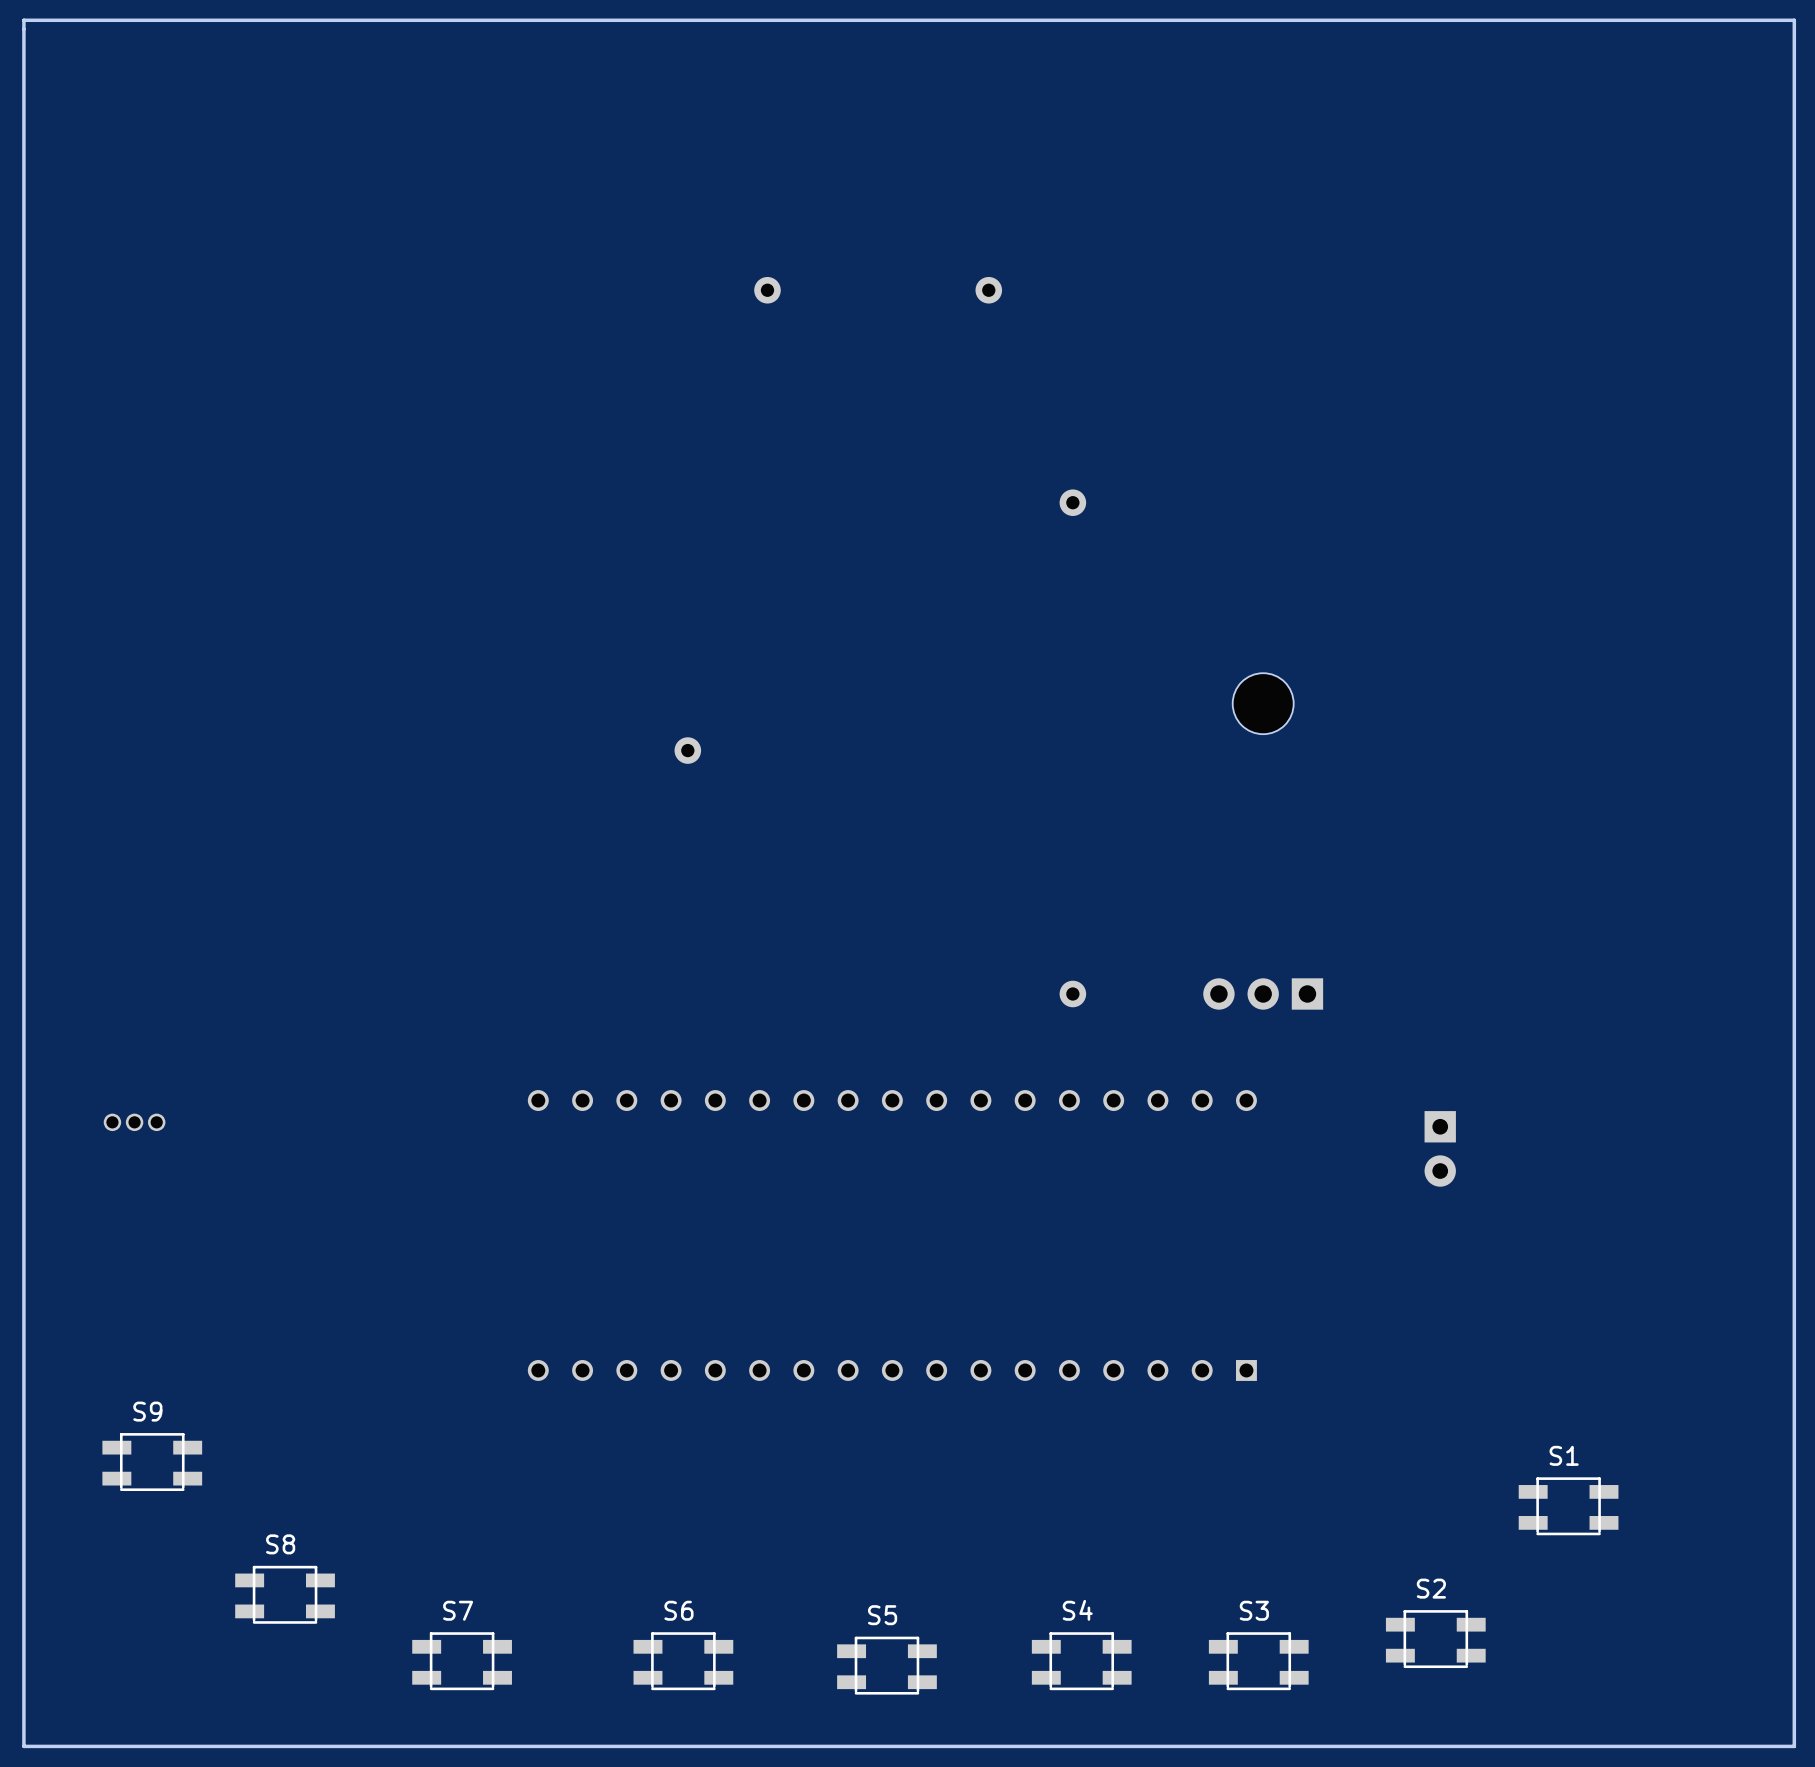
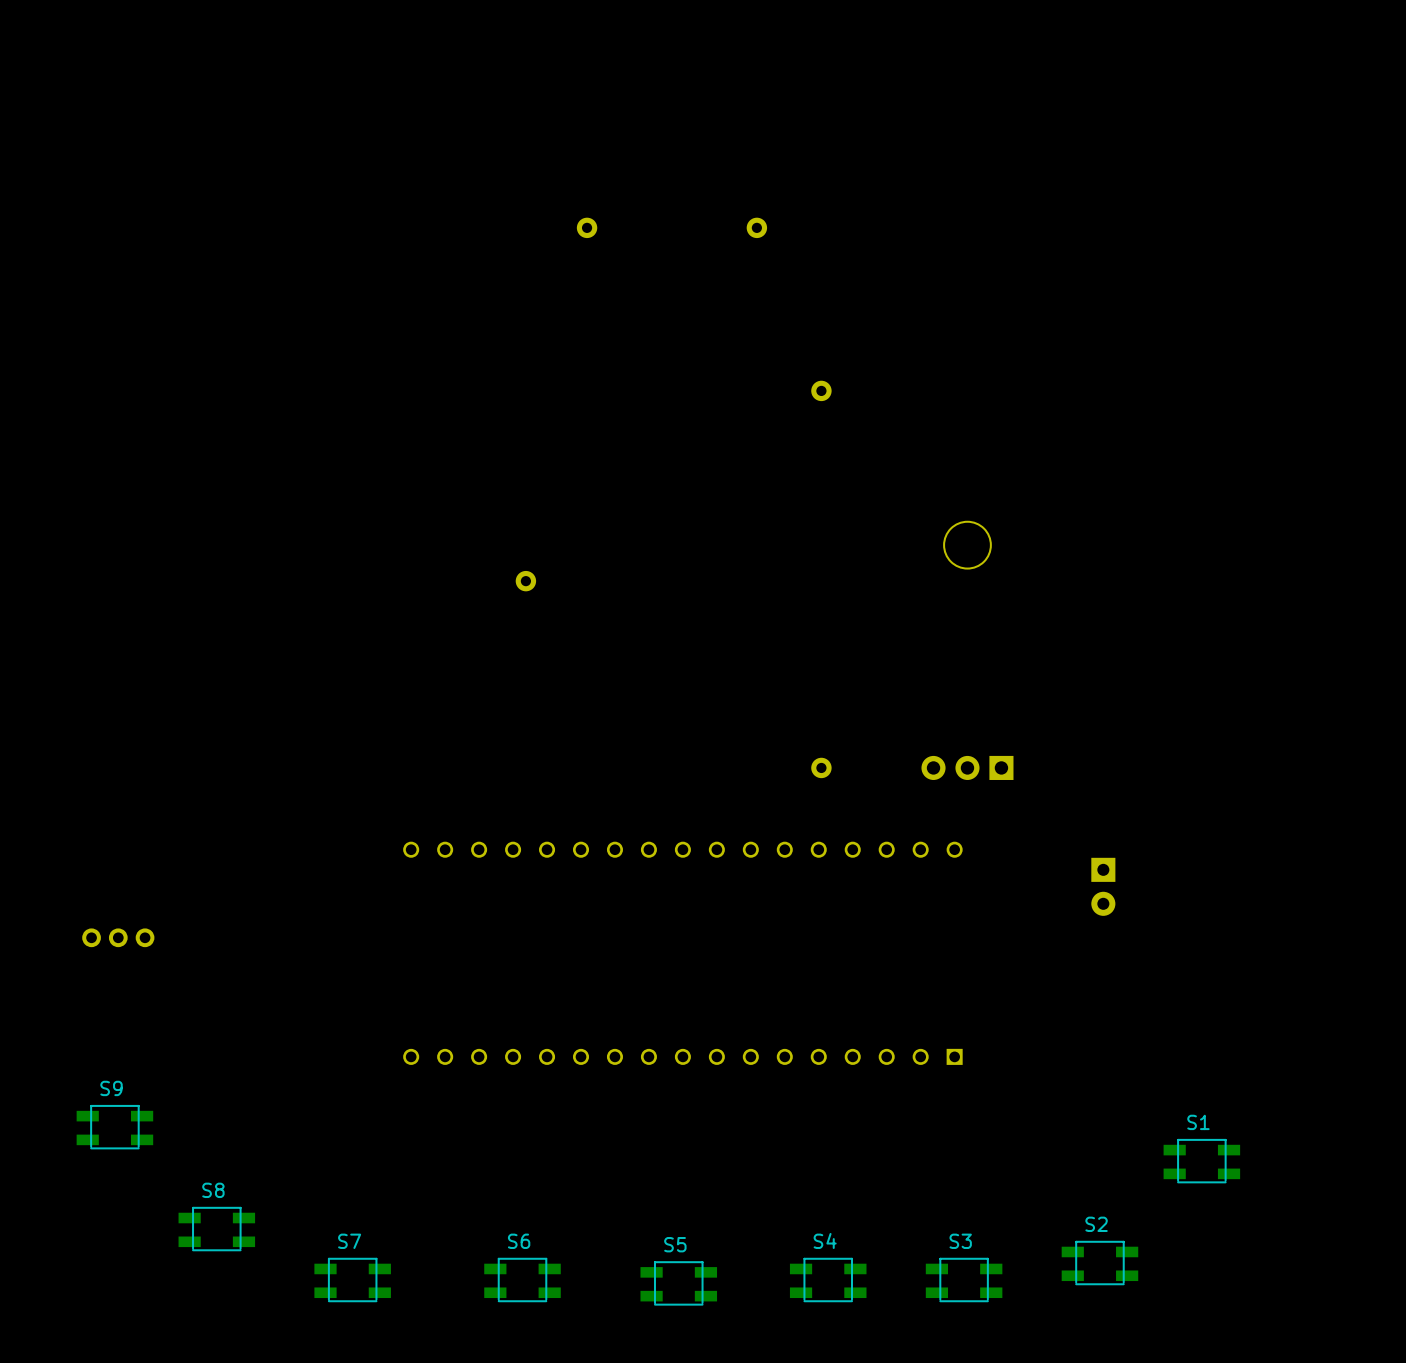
board edge: (1794, 20) (1794, 1746) (23, 1746) (23, 20) (1794, 20) -> none
part: (134, 1122) -> none
part: none -> (118, 937)

